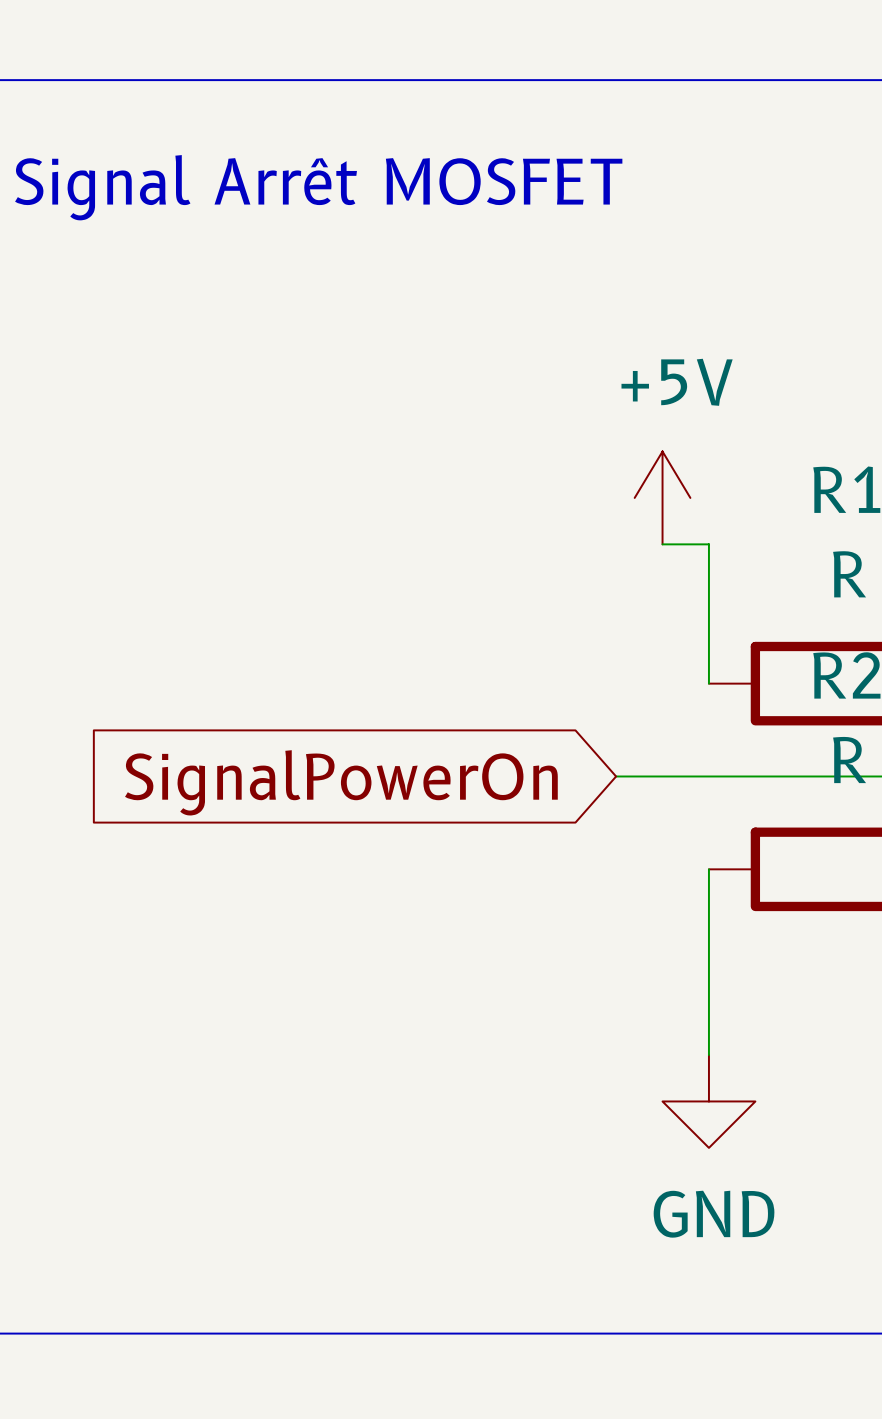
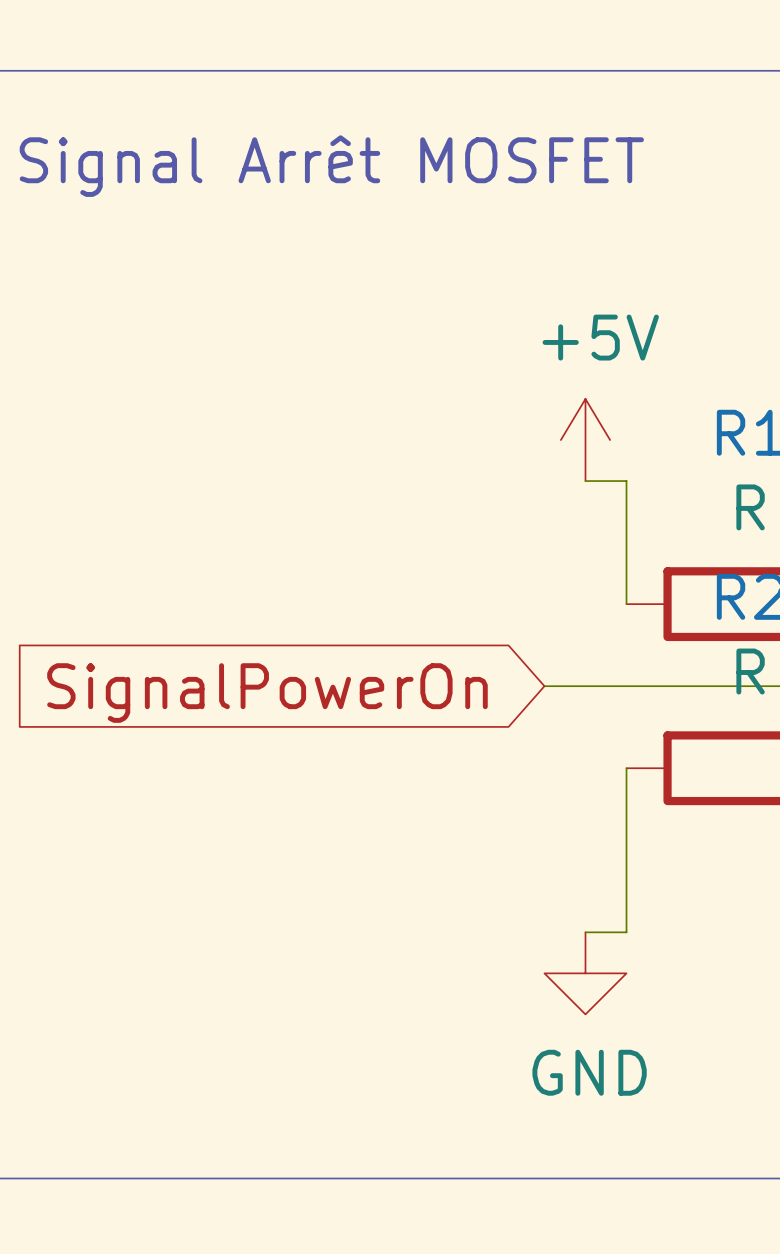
wire: none -> (585, 932) (626, 932)
power symbol position: GND (708, 1101) -> GND (585, 973)

